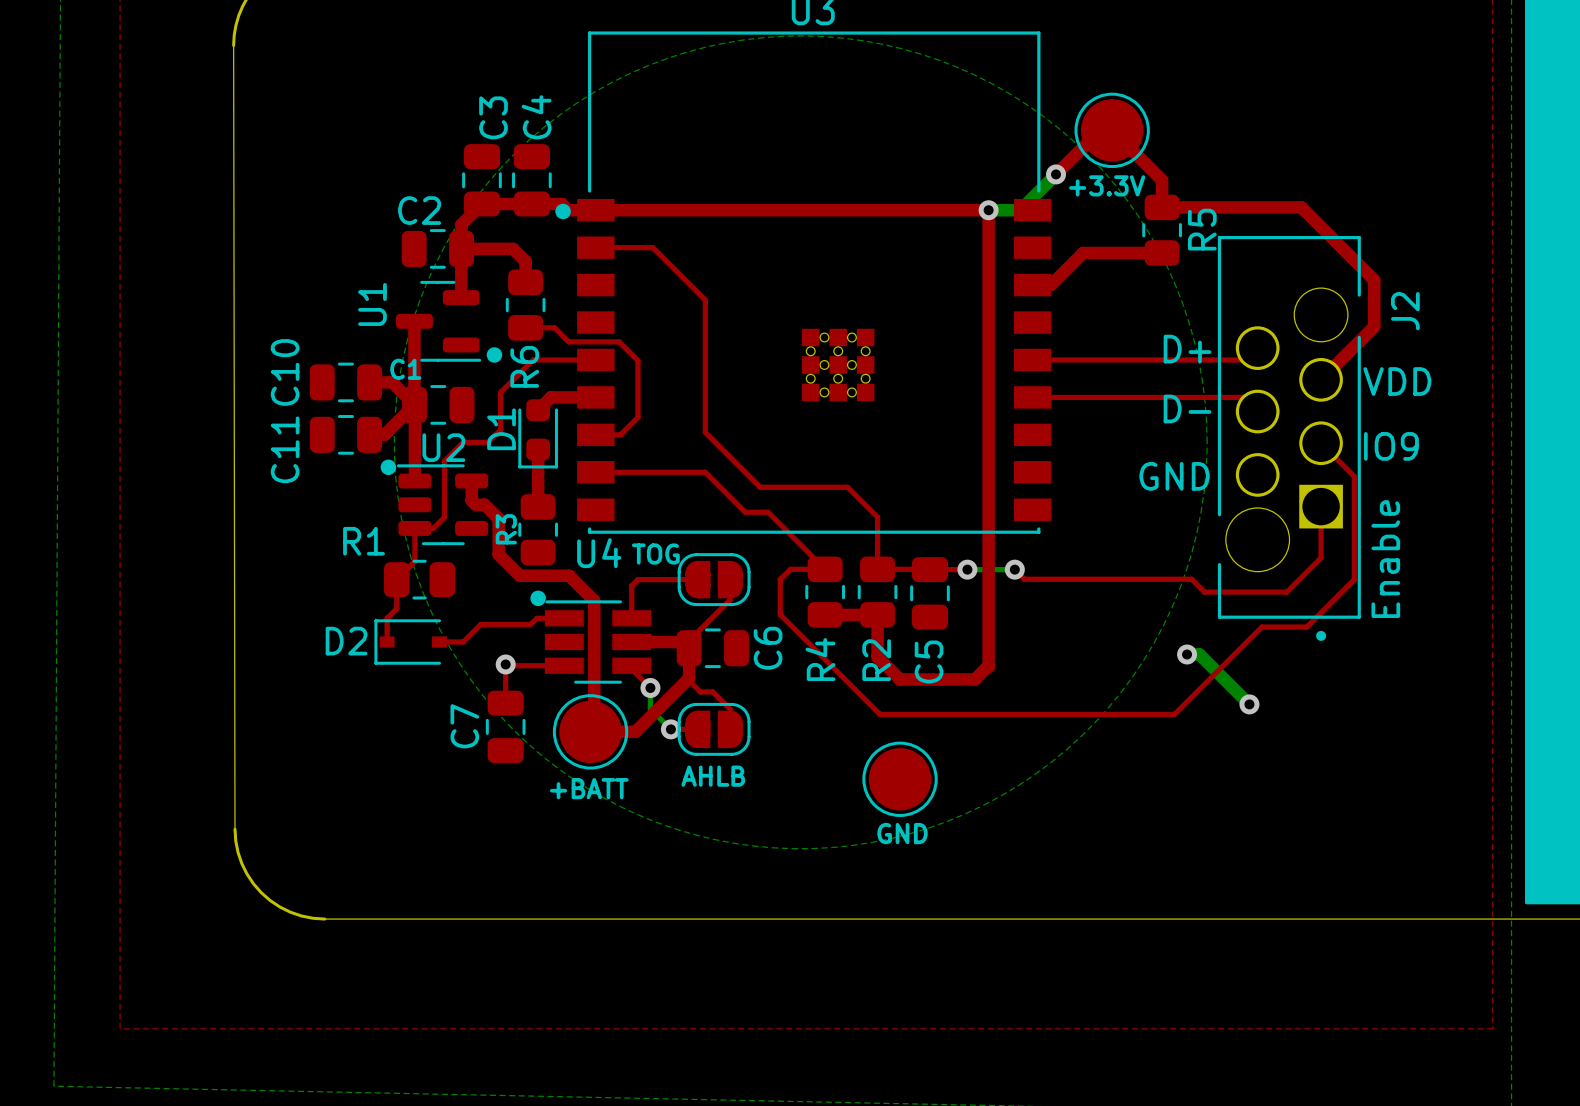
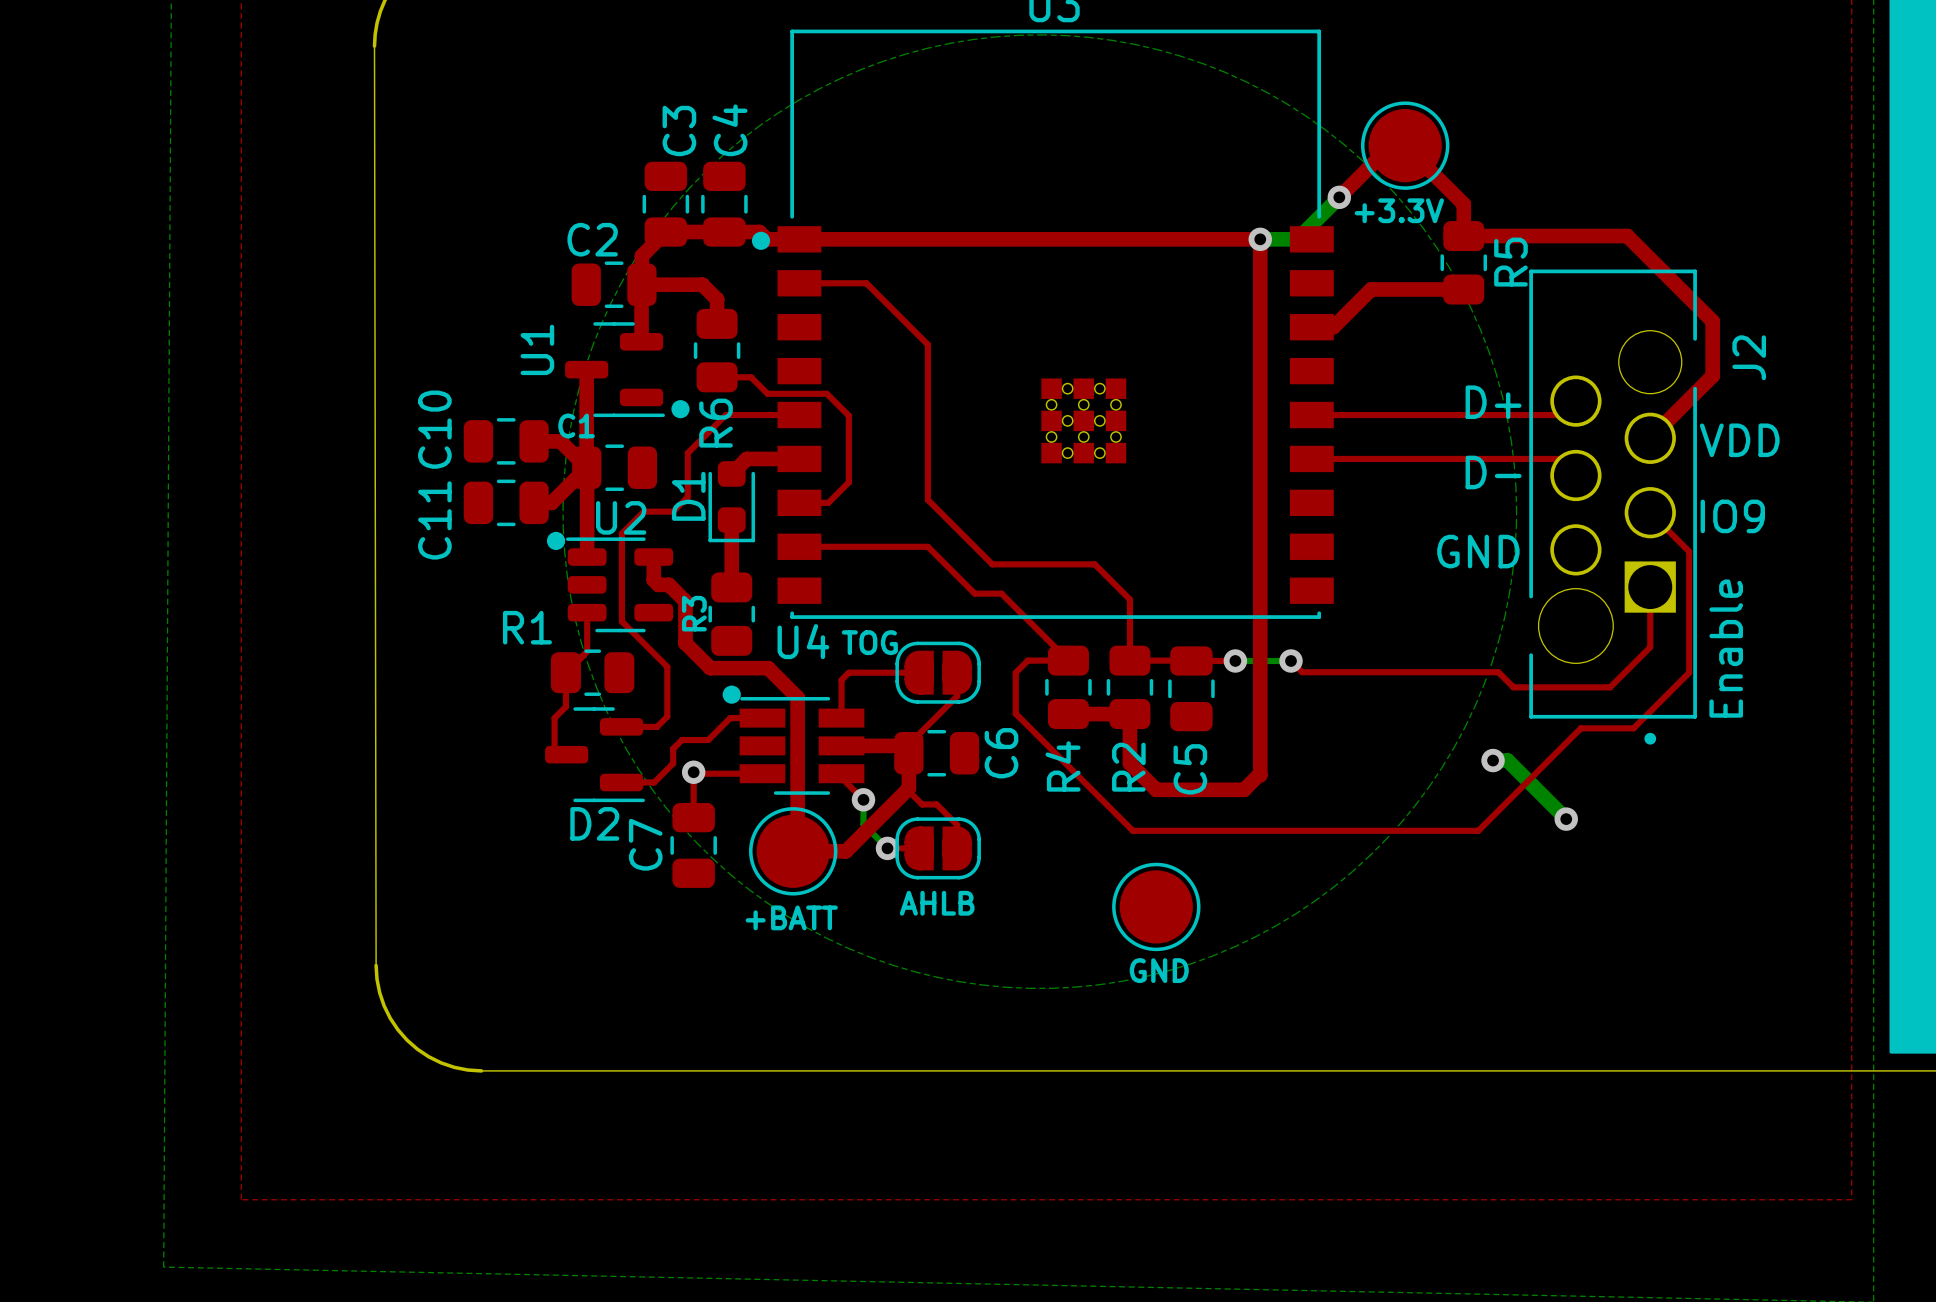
top track: (444, 517) (433, 528) (414, 528) -> (621, 599) (621, 621) (667, 666) (667, 716) (657, 726) (621, 726)
D2 footprint: [374, 619, 448, 665] -> [545, 707, 645, 803]
top track: (530, 624) (480, 624) (463, 642) (439, 642) -> (722, 725) (708, 740) (681, 740) (673, 748) (673, 763) (654, 782) (621, 782)
D2 name position: D2 (346, 641) -> D2 (594, 823)

